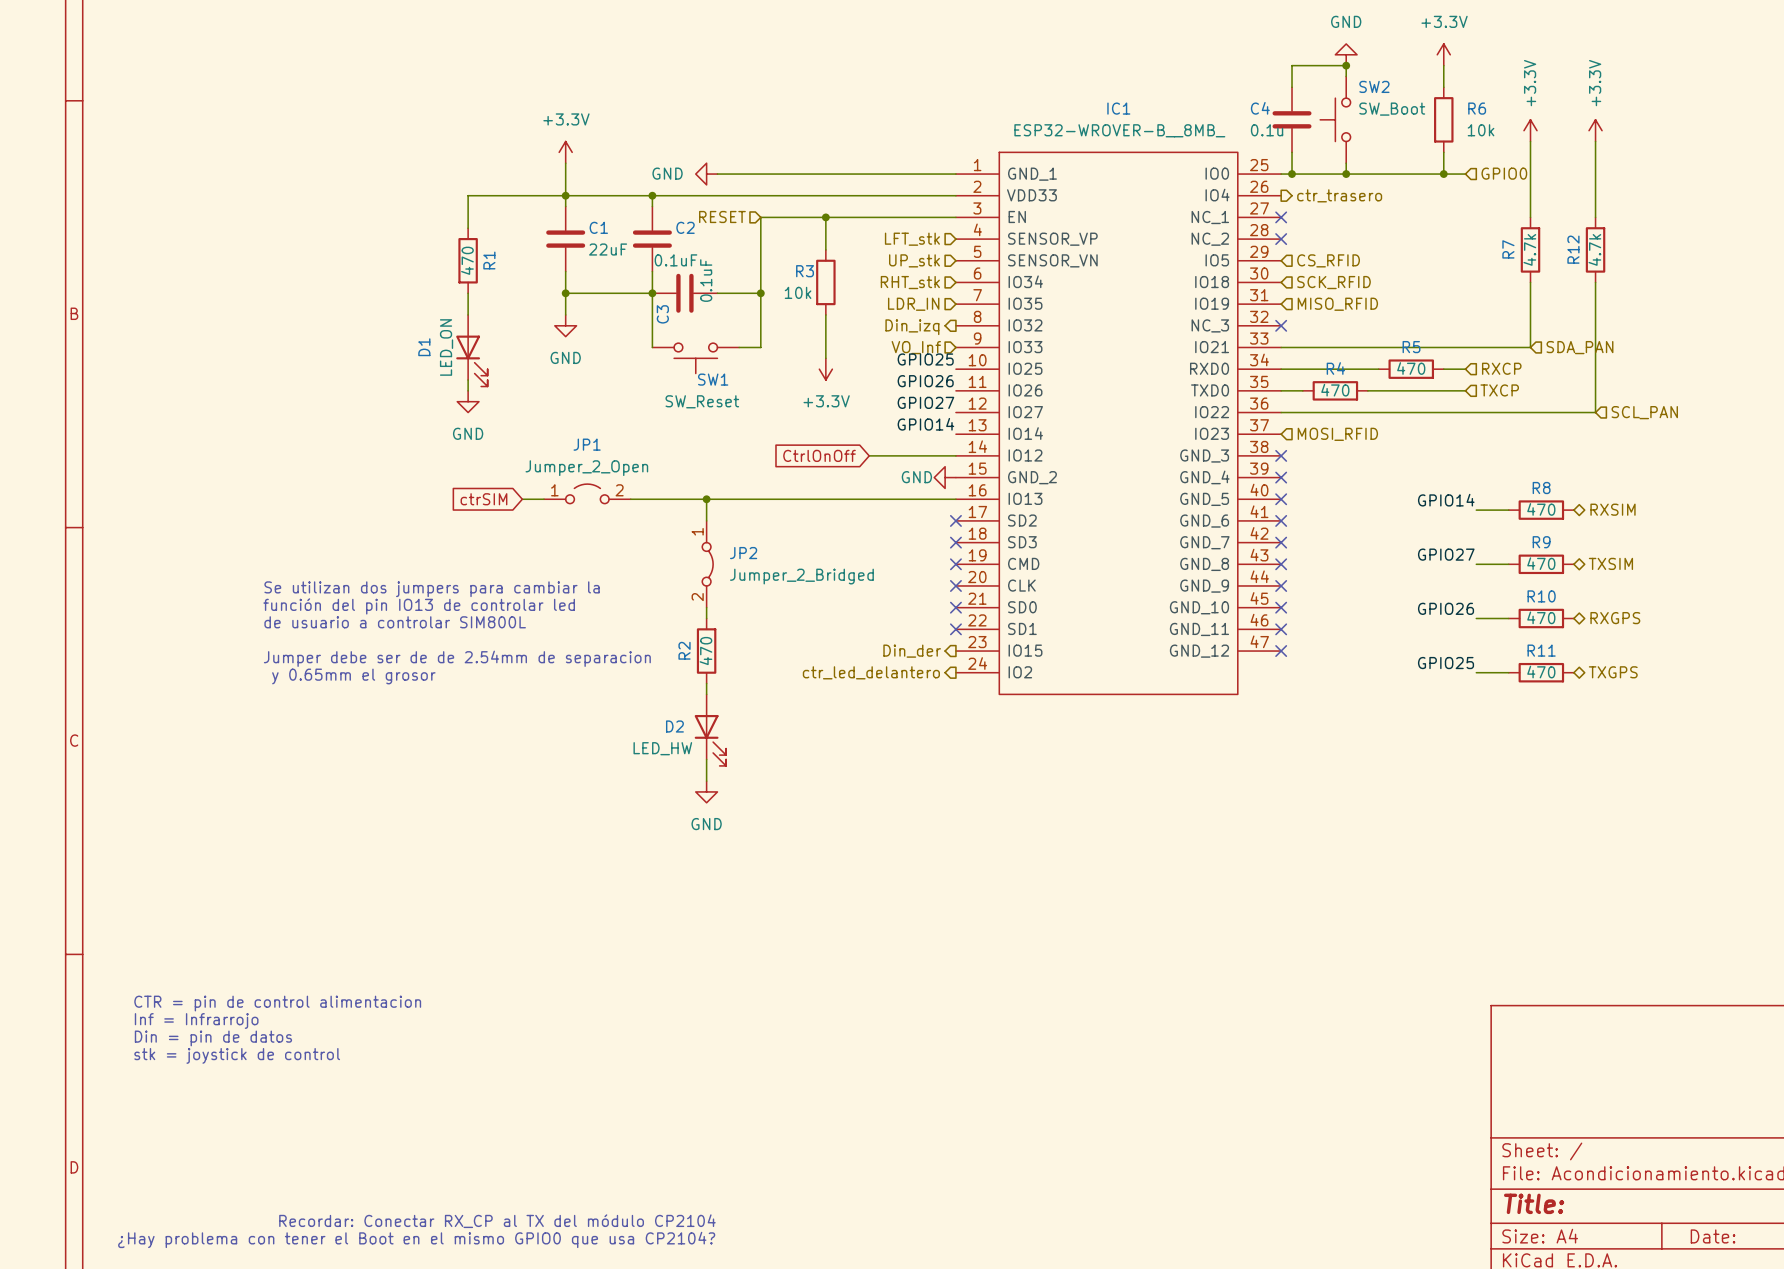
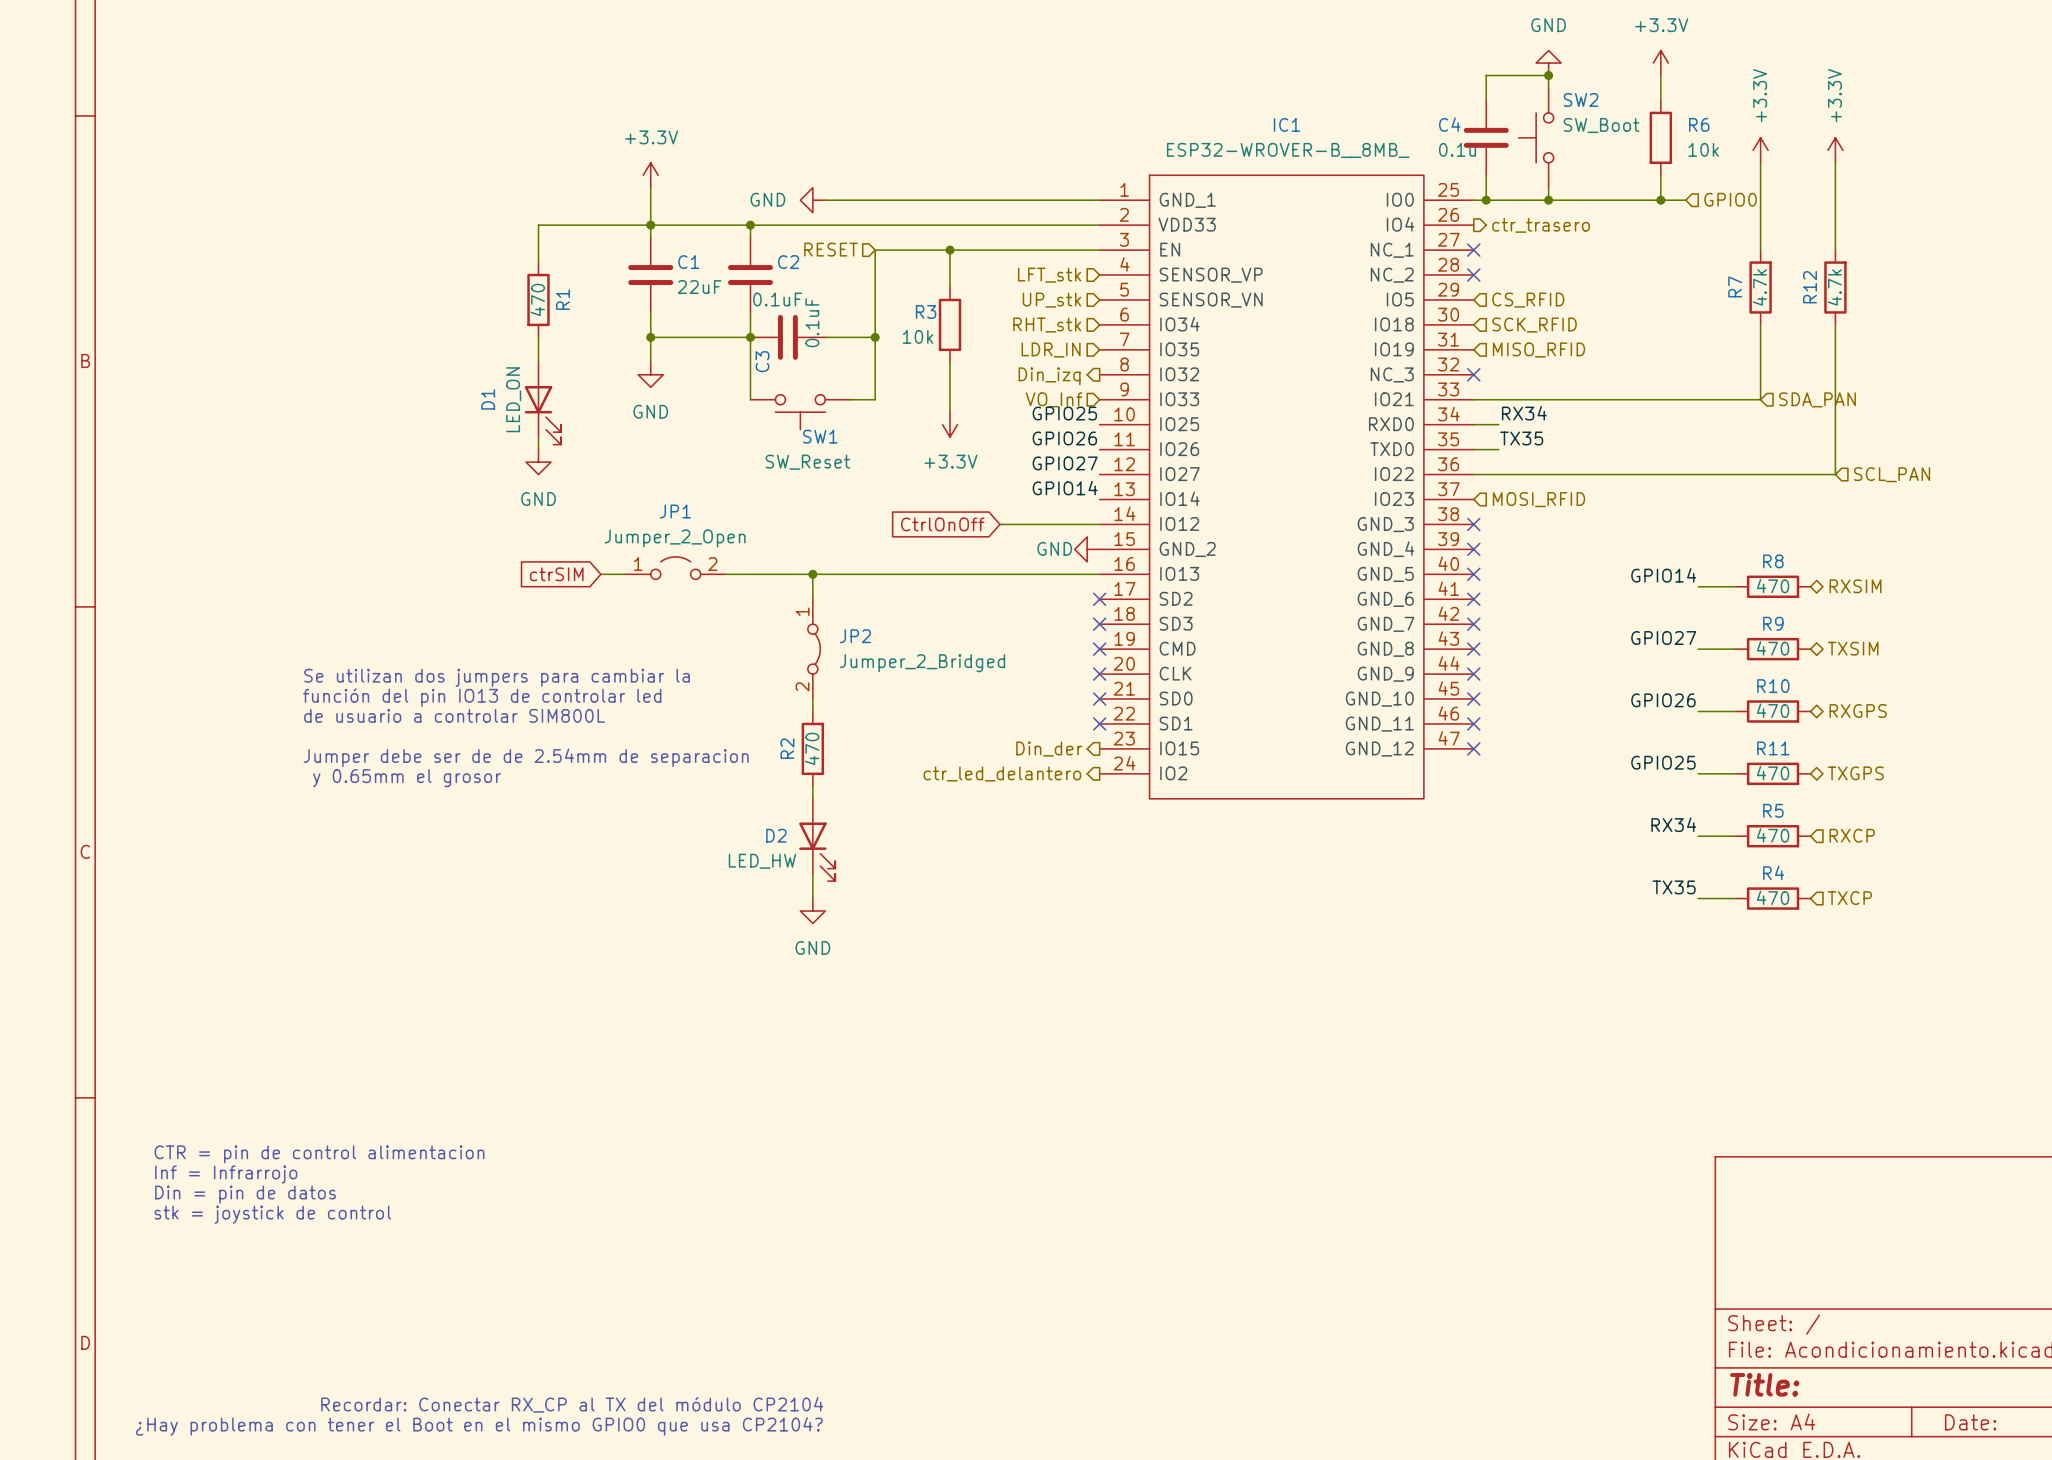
label: none -> RX34 (1524, 413)
hierarchical label: RXCP (1501, 368) -> none
wire: (1302, 369) (1378, 369) -> none
R5 position: (1411, 369) -> (1773, 836)
wire: (1443, 369) (1465, 369) -> none
label: none -> TX35 (1521, 438)
R4 position: (1335, 390) -> (1773, 898)
wire: (1367, 390) (1465, 390) -> none
hierarchical label: TXCP (1499, 390) -> none
label: none -> RX34 (1673, 824)
wire: none -> (1698, 836) (1735, 836)
hierarchical label: none -> RXCP (1852, 835)
label: none -> TX35 (1674, 887)
hierarchical label: none -> TXCP (1849, 898)
wire: none -> (1698, 898) (1735, 898)

